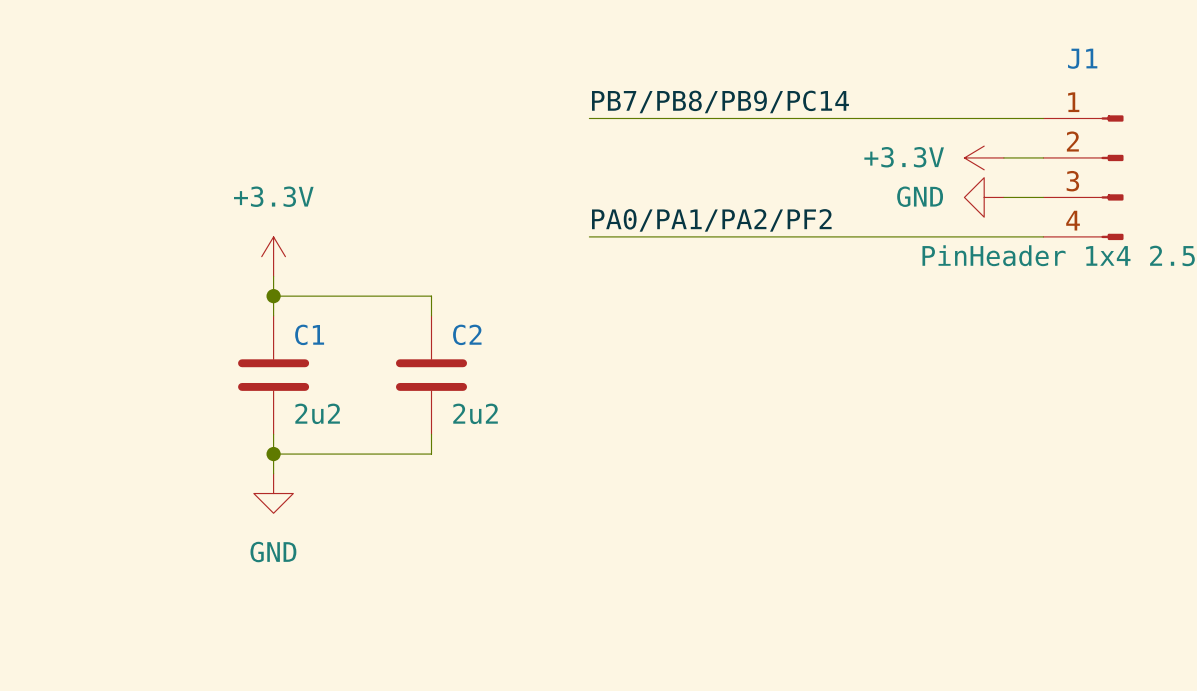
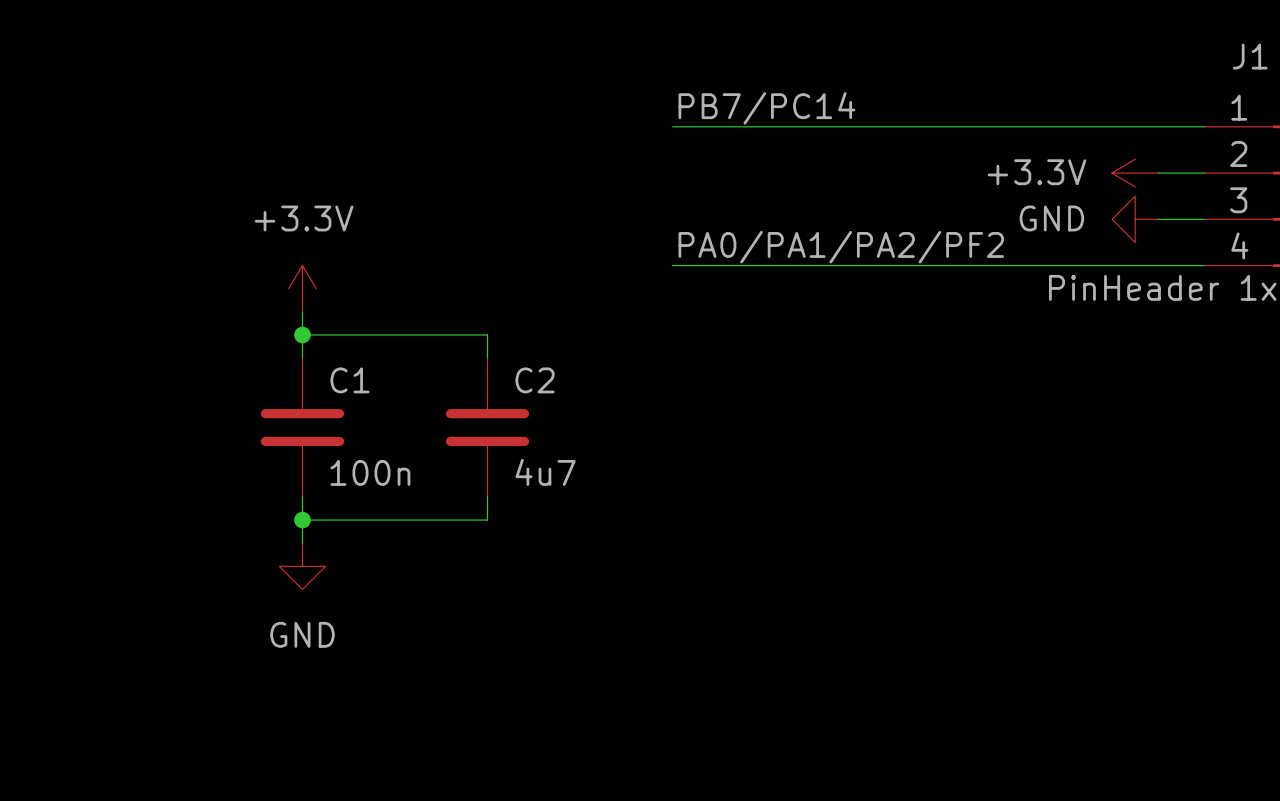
label: PB7/PB8/PB9/PC14 (720, 101) -> PB7/PC14 (766, 108)
C1 value: 2u2 (317, 413) -> 100n (370, 472)
C2 value: 2u2 (475, 413) -> 4u7 (545, 472)

